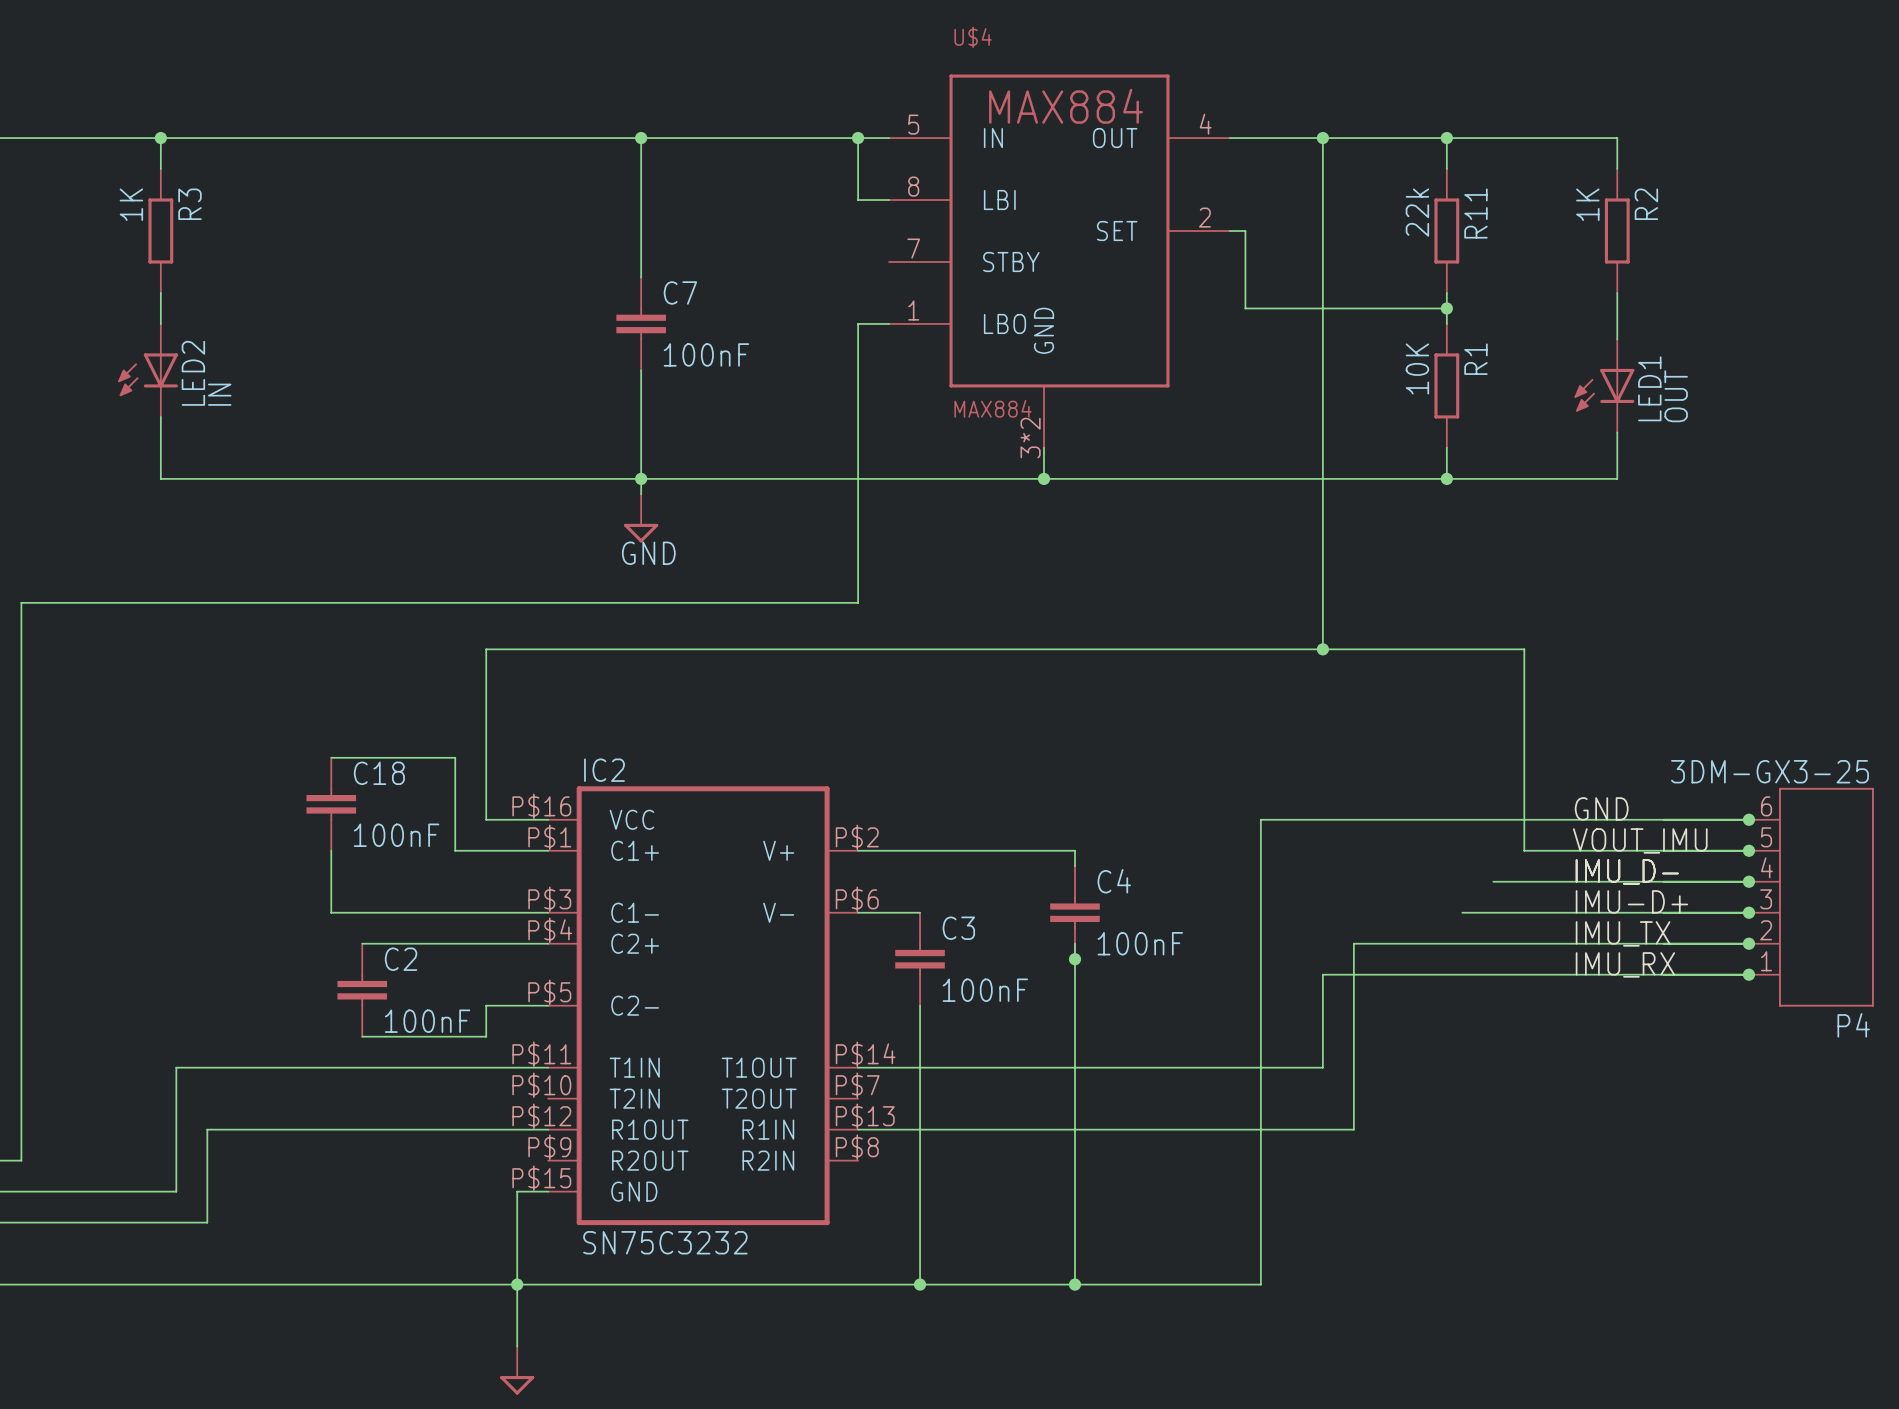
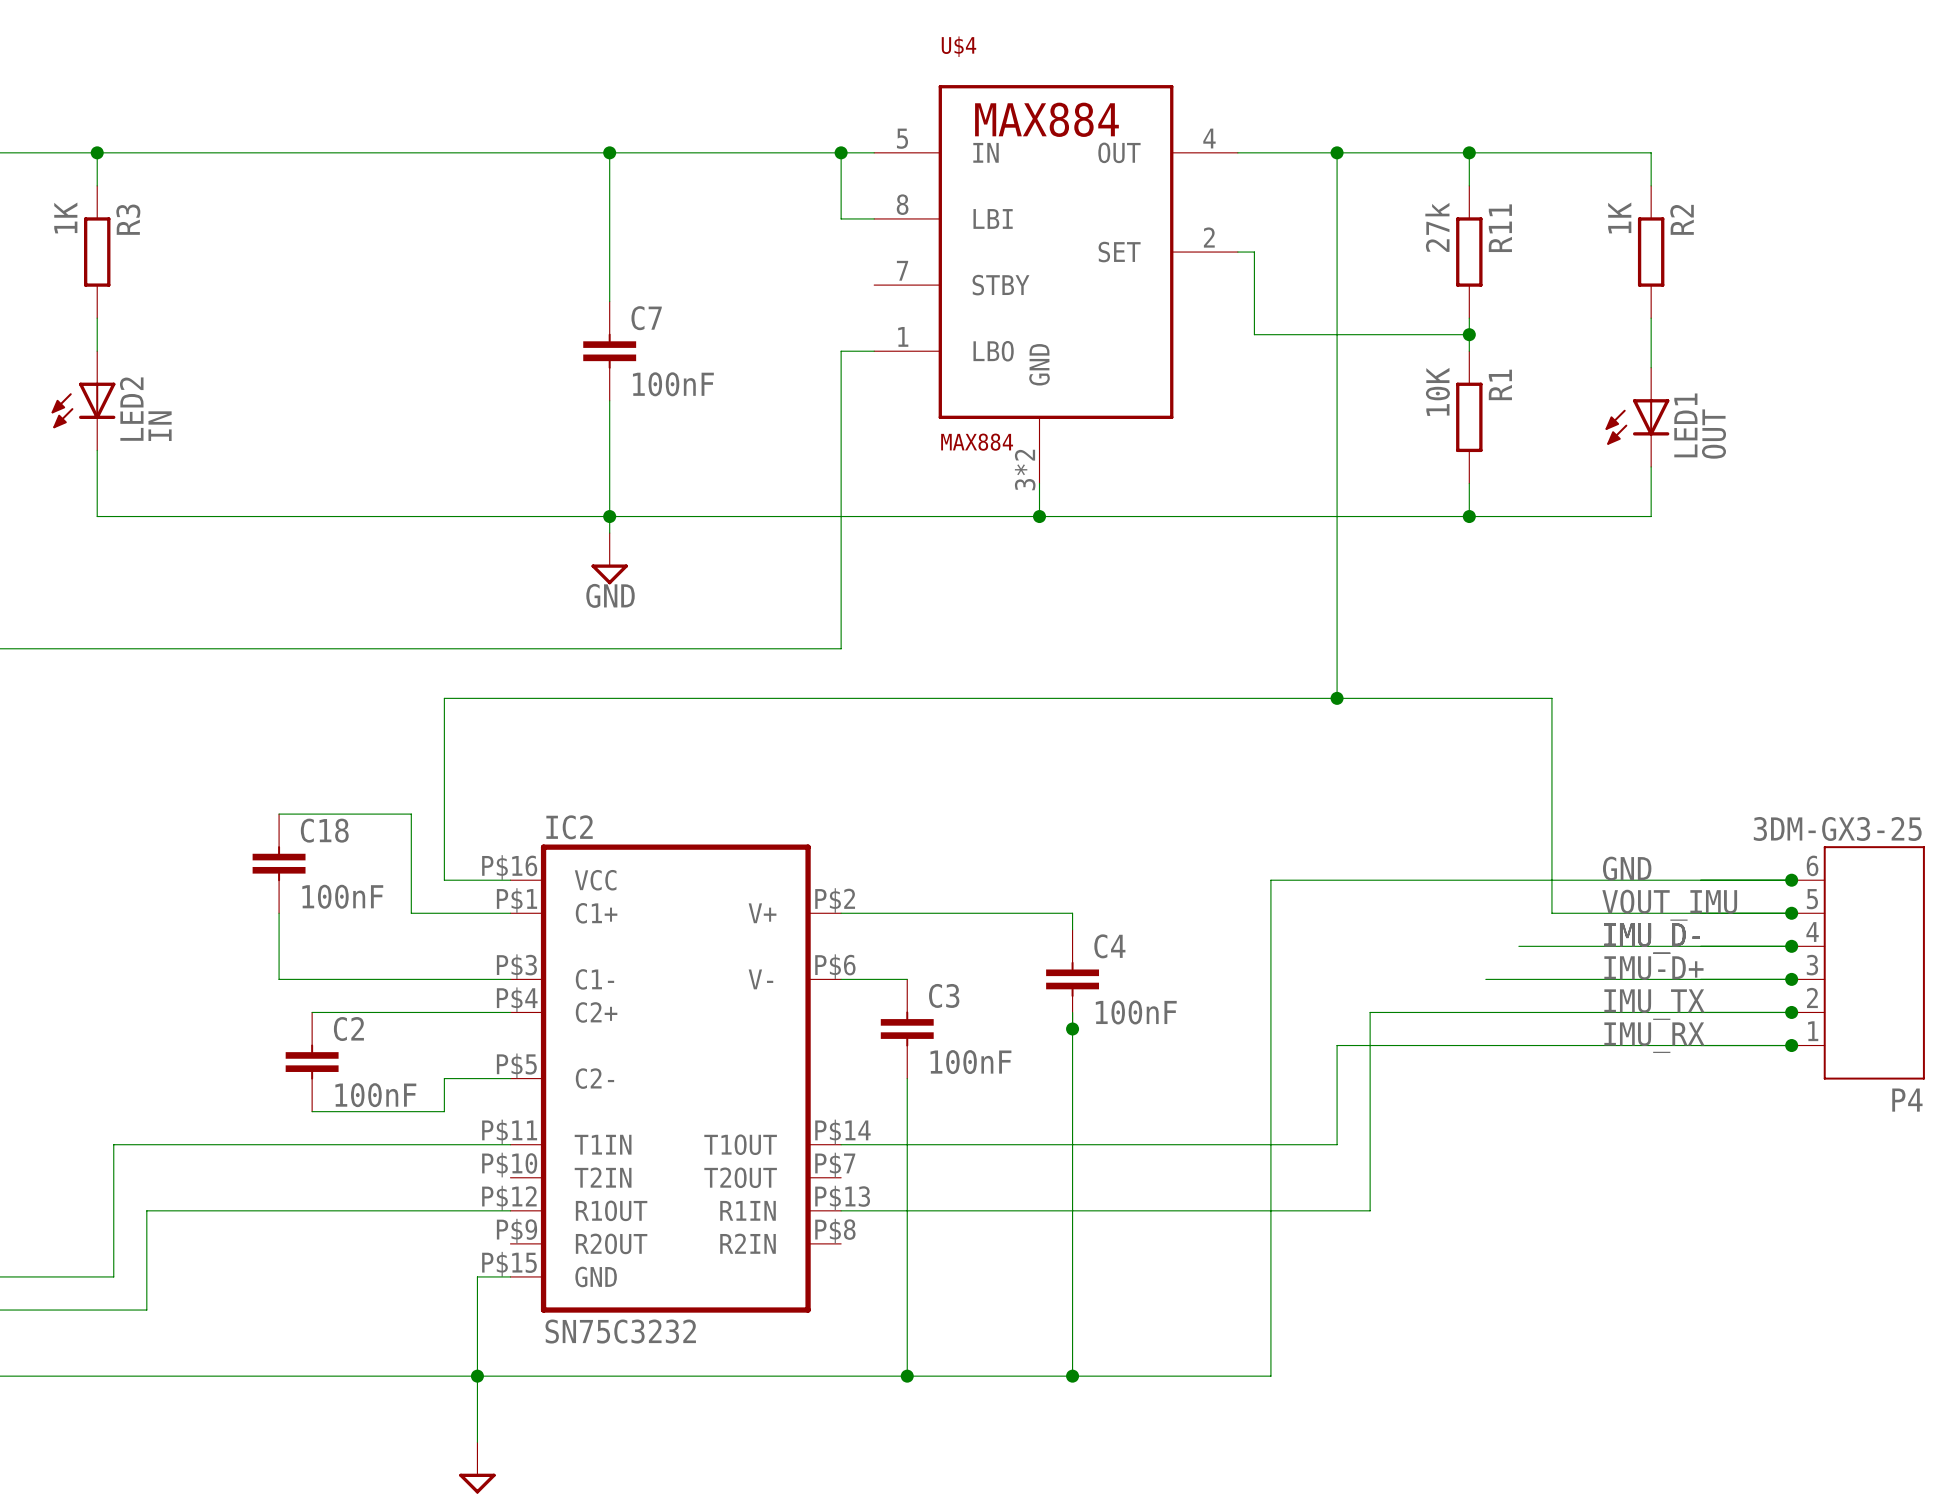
R11 value: 22k (1417, 212) -> 27k (1437, 227)

